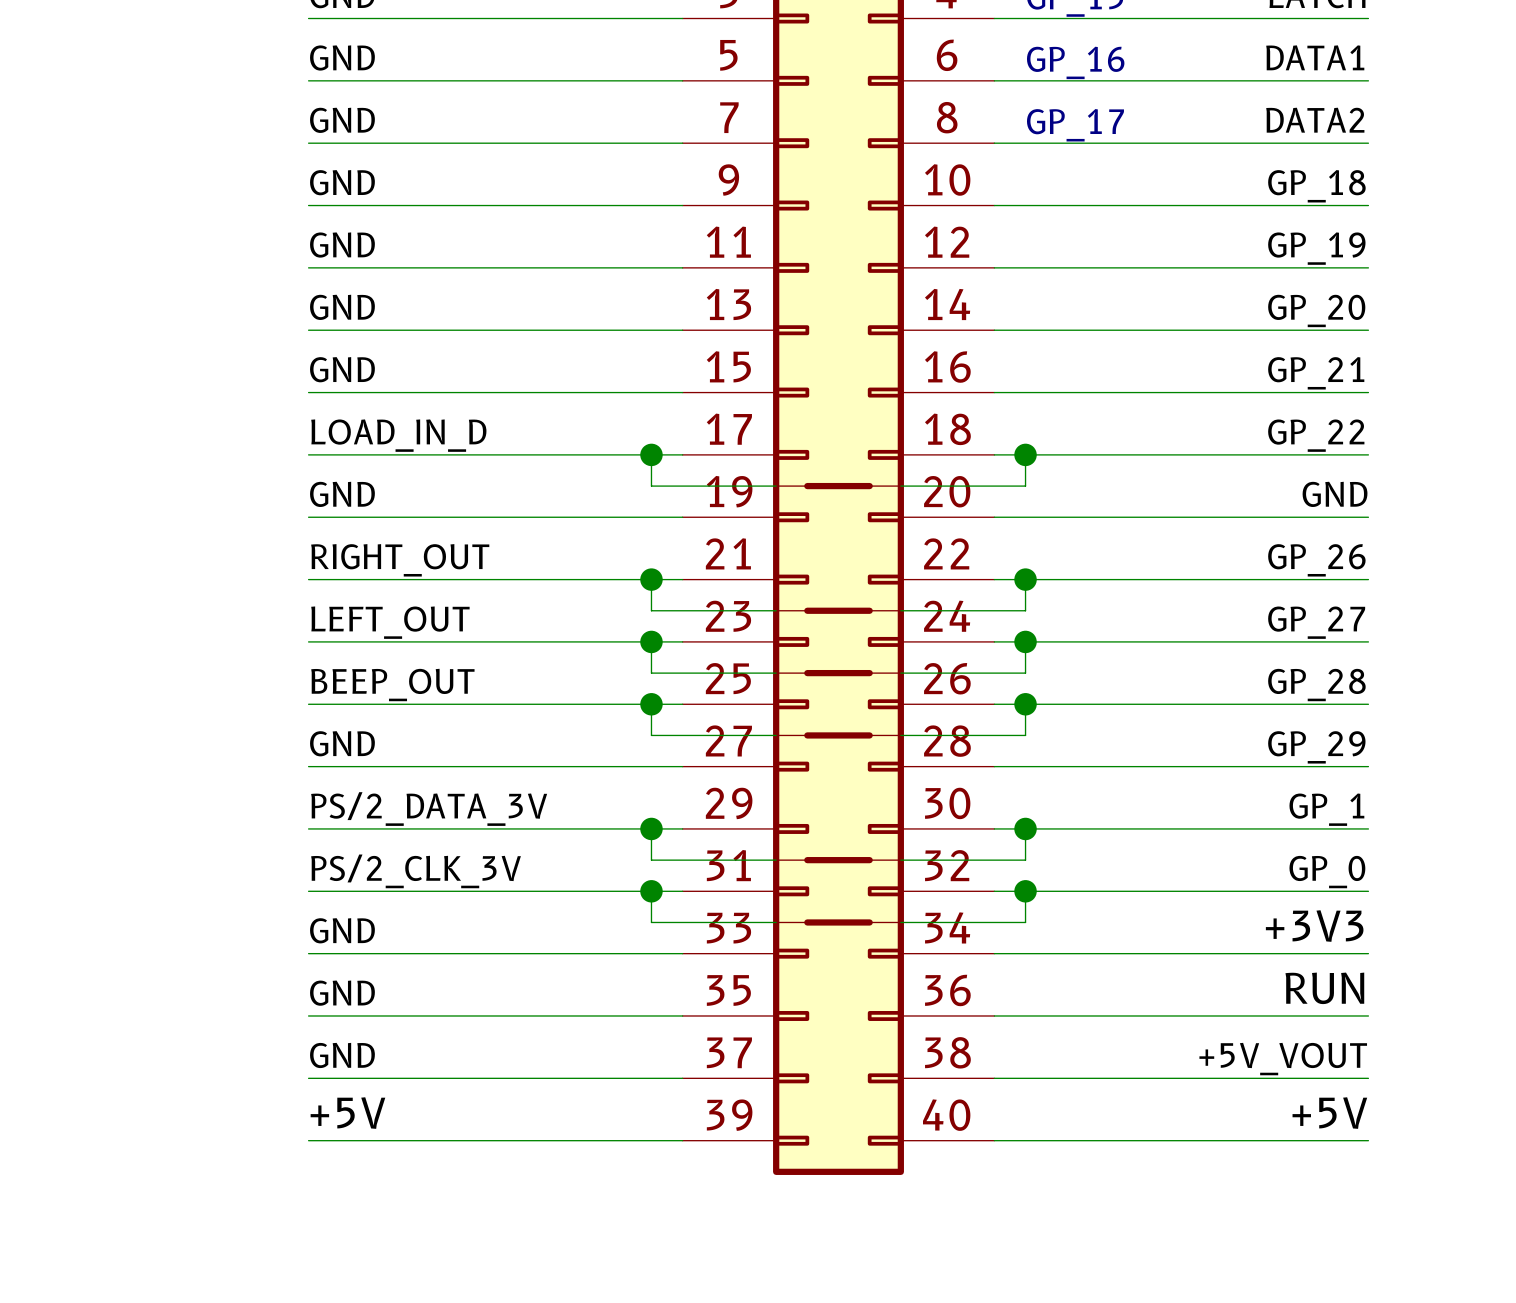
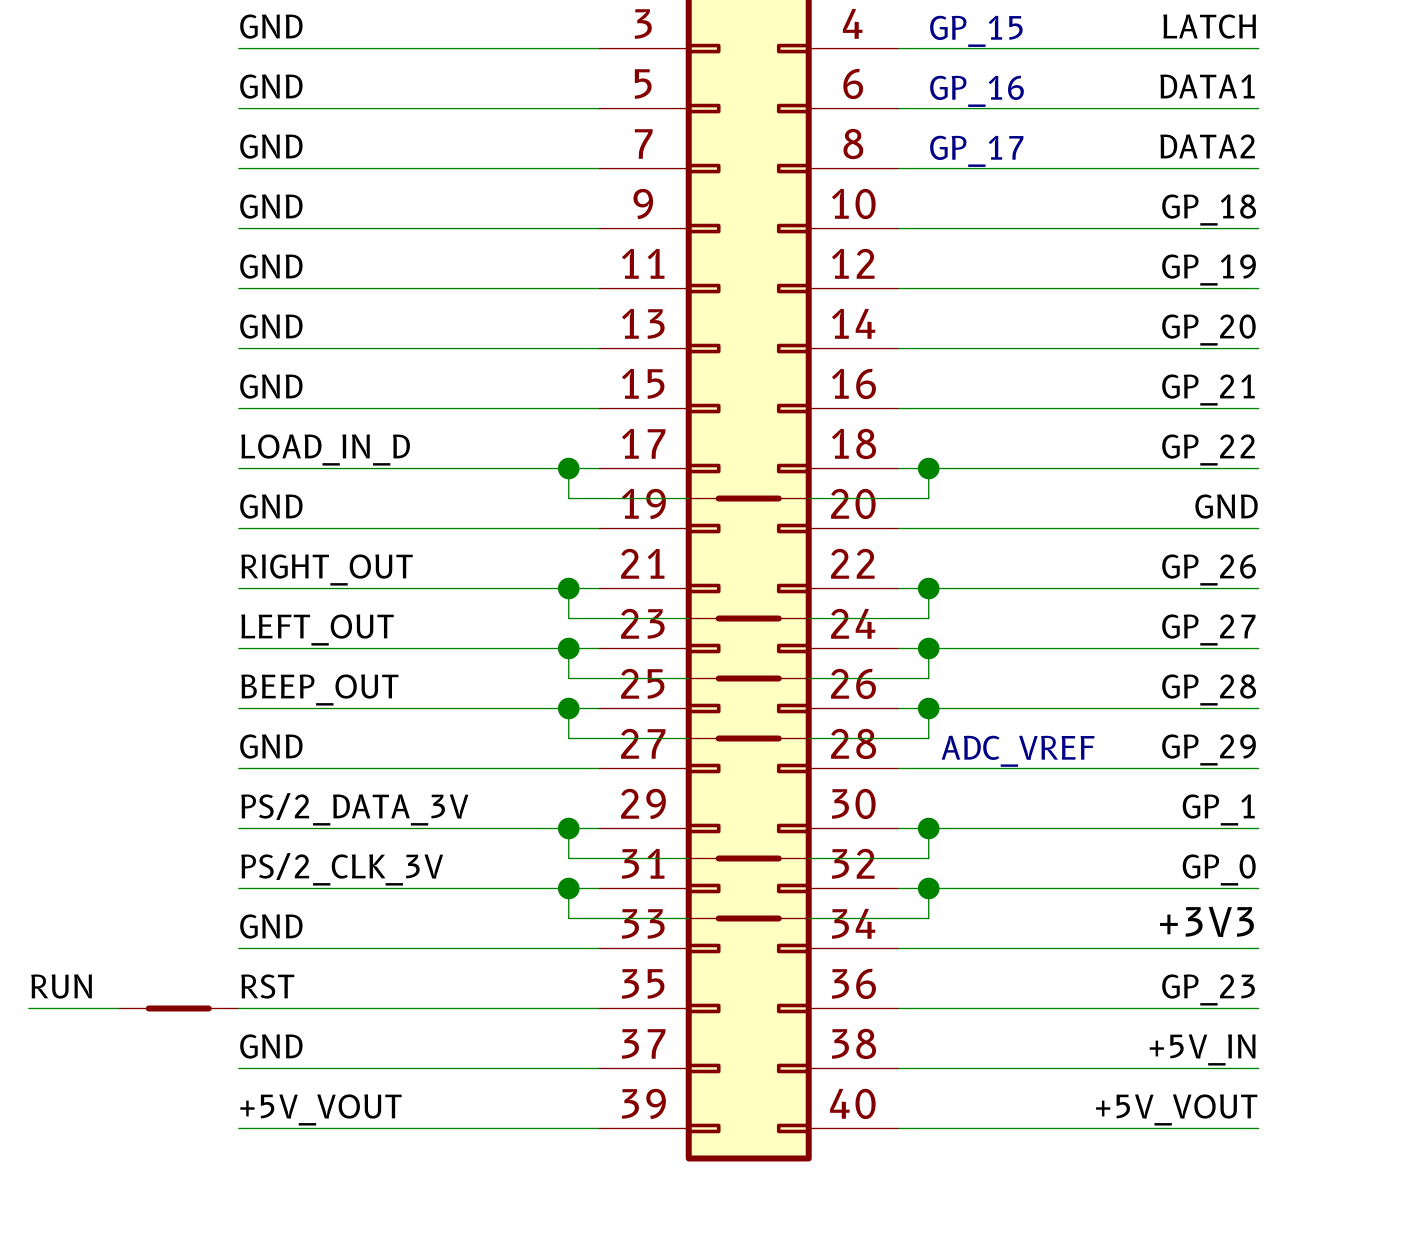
text: none -> ADC_VREF (1018, 751)
label: RUN (1324, 988) -> GP_23 (1208, 989)
label: none -> RUN (61, 986)
label: GND (342, 993) -> RST (267, 986)
wire: none -> (28, 1008) (118, 1008)
part: none -> (178, 1008)
label: +5V_VOUT (1283, 1059) -> +5V_IN (1202, 1049)
label: +5V (347, 1113) -> +5V_VOUT (320, 1109)
label: +5V (1329, 1113) -> +5V_VOUT (1176, 1109)

